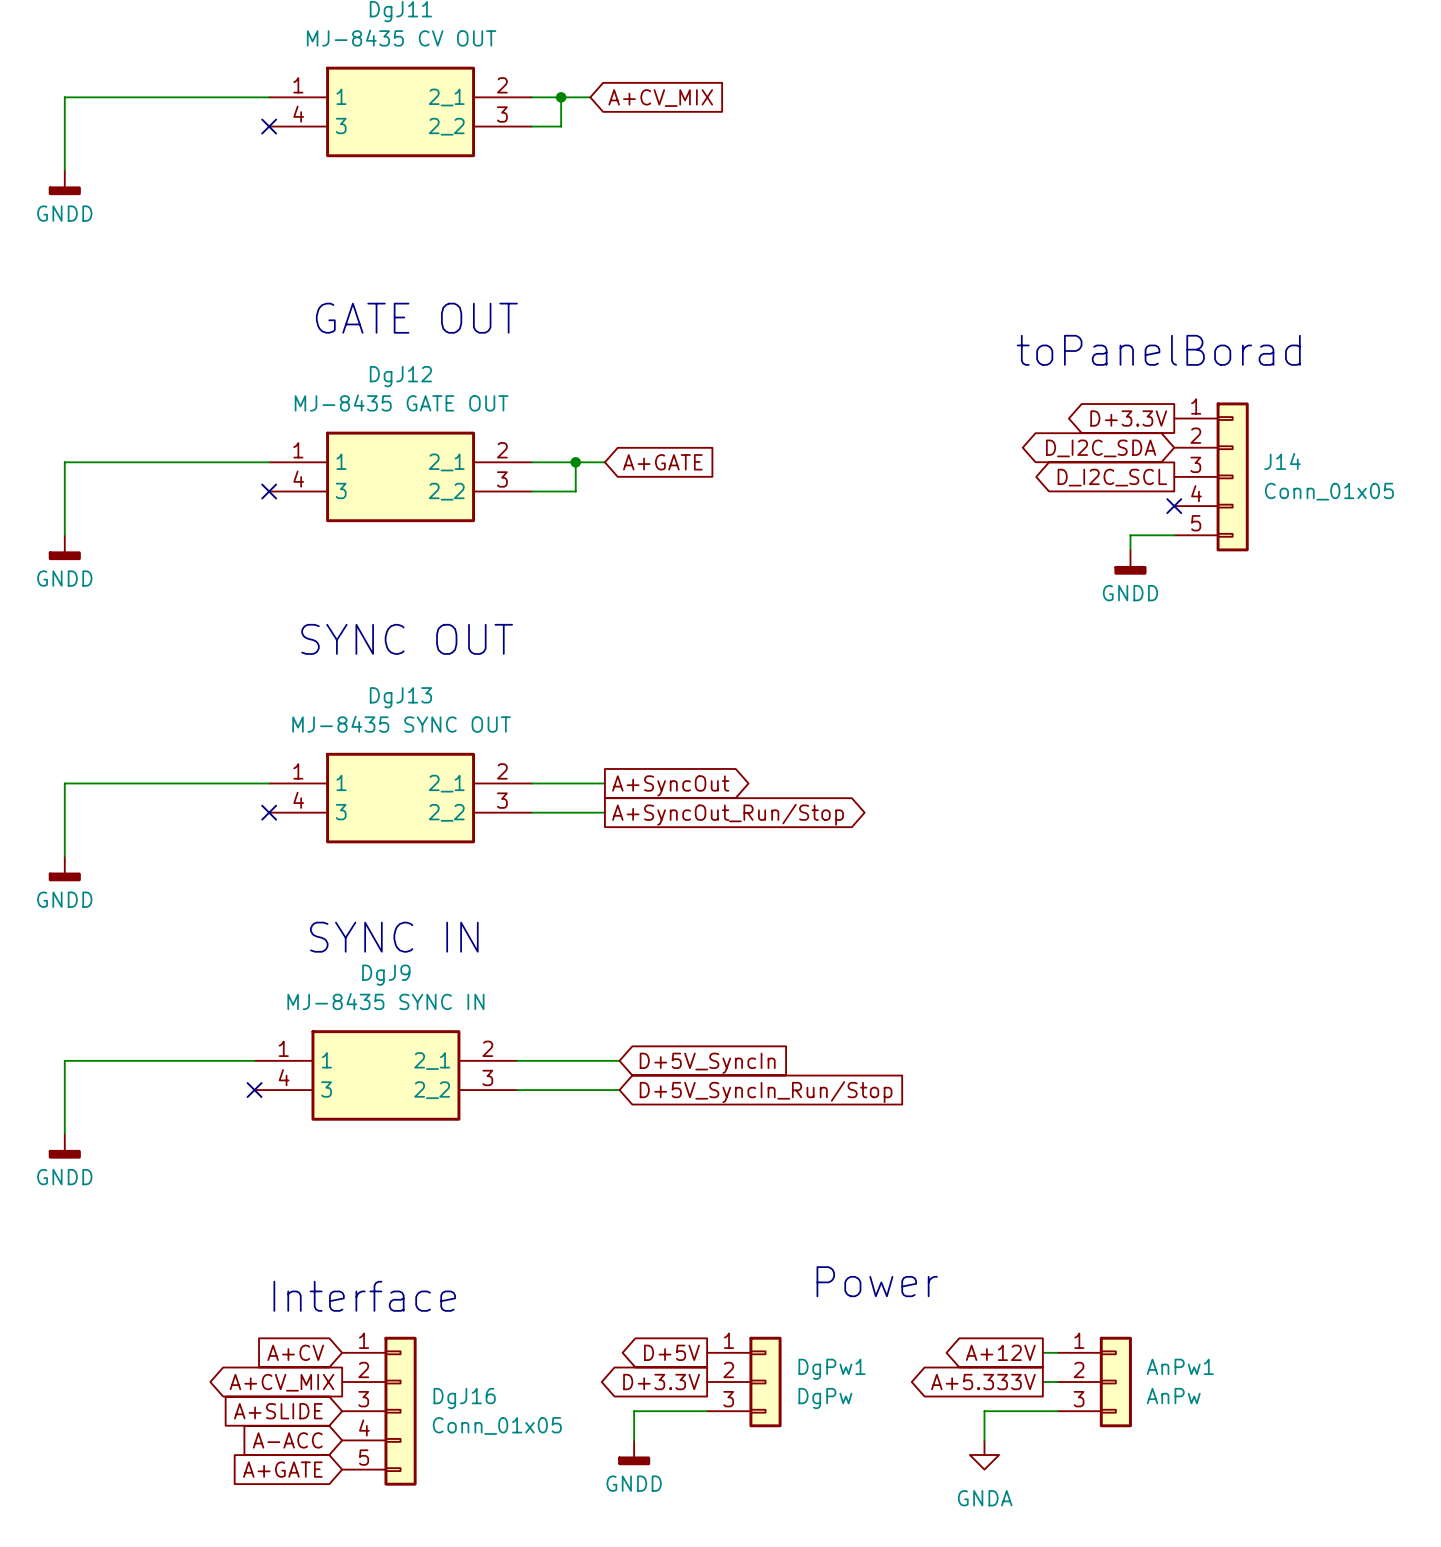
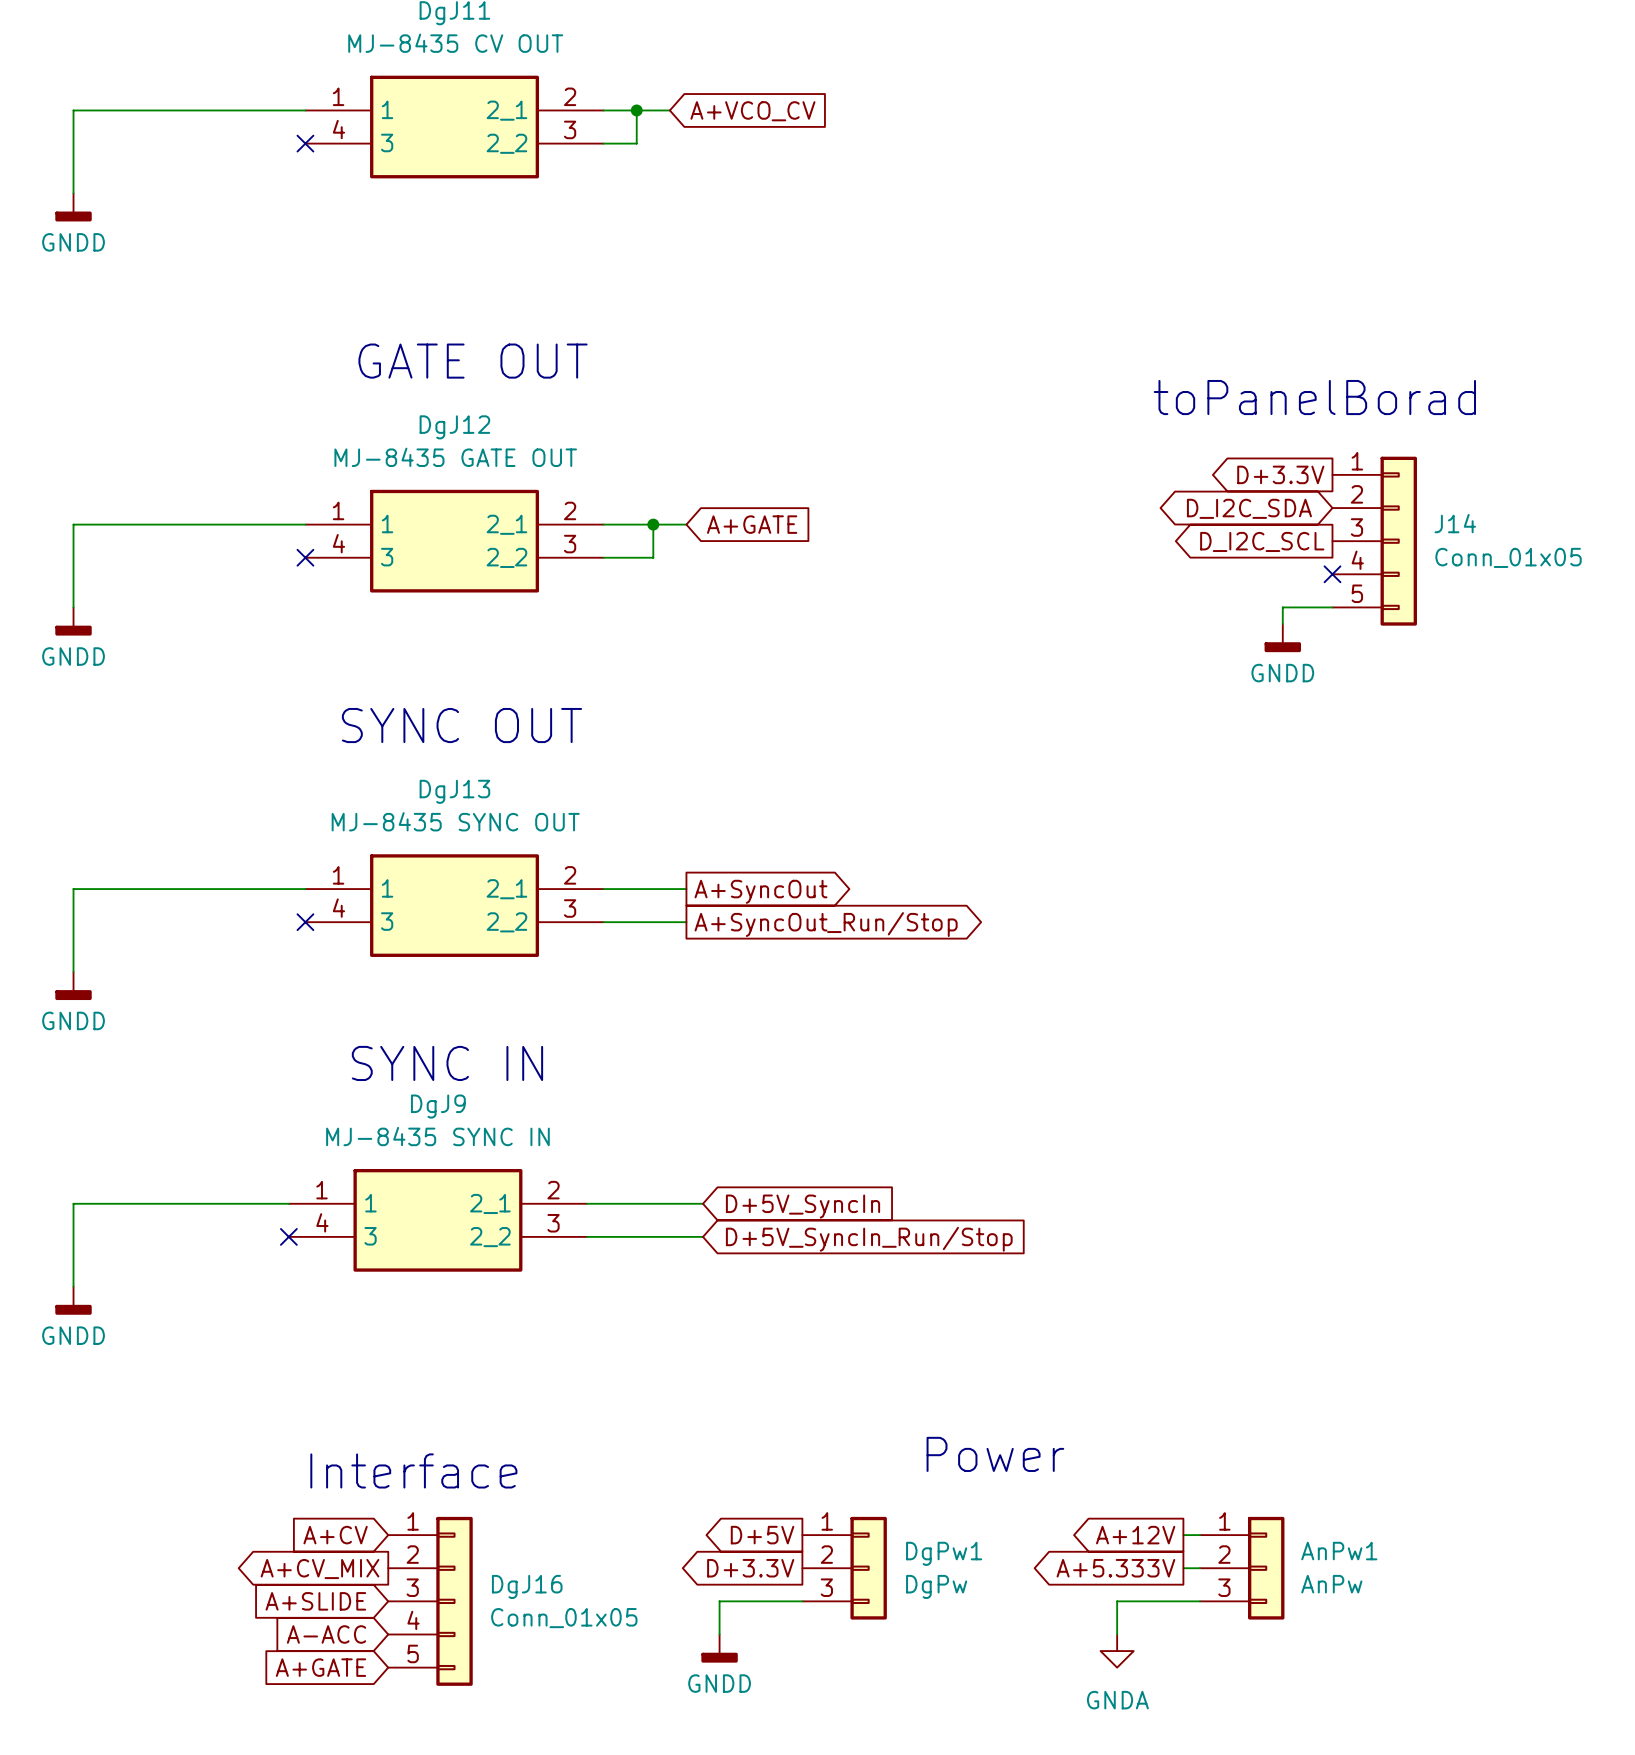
global label: A+CV_MIX (660, 98) -> A+VCO_CV (752, 111)

